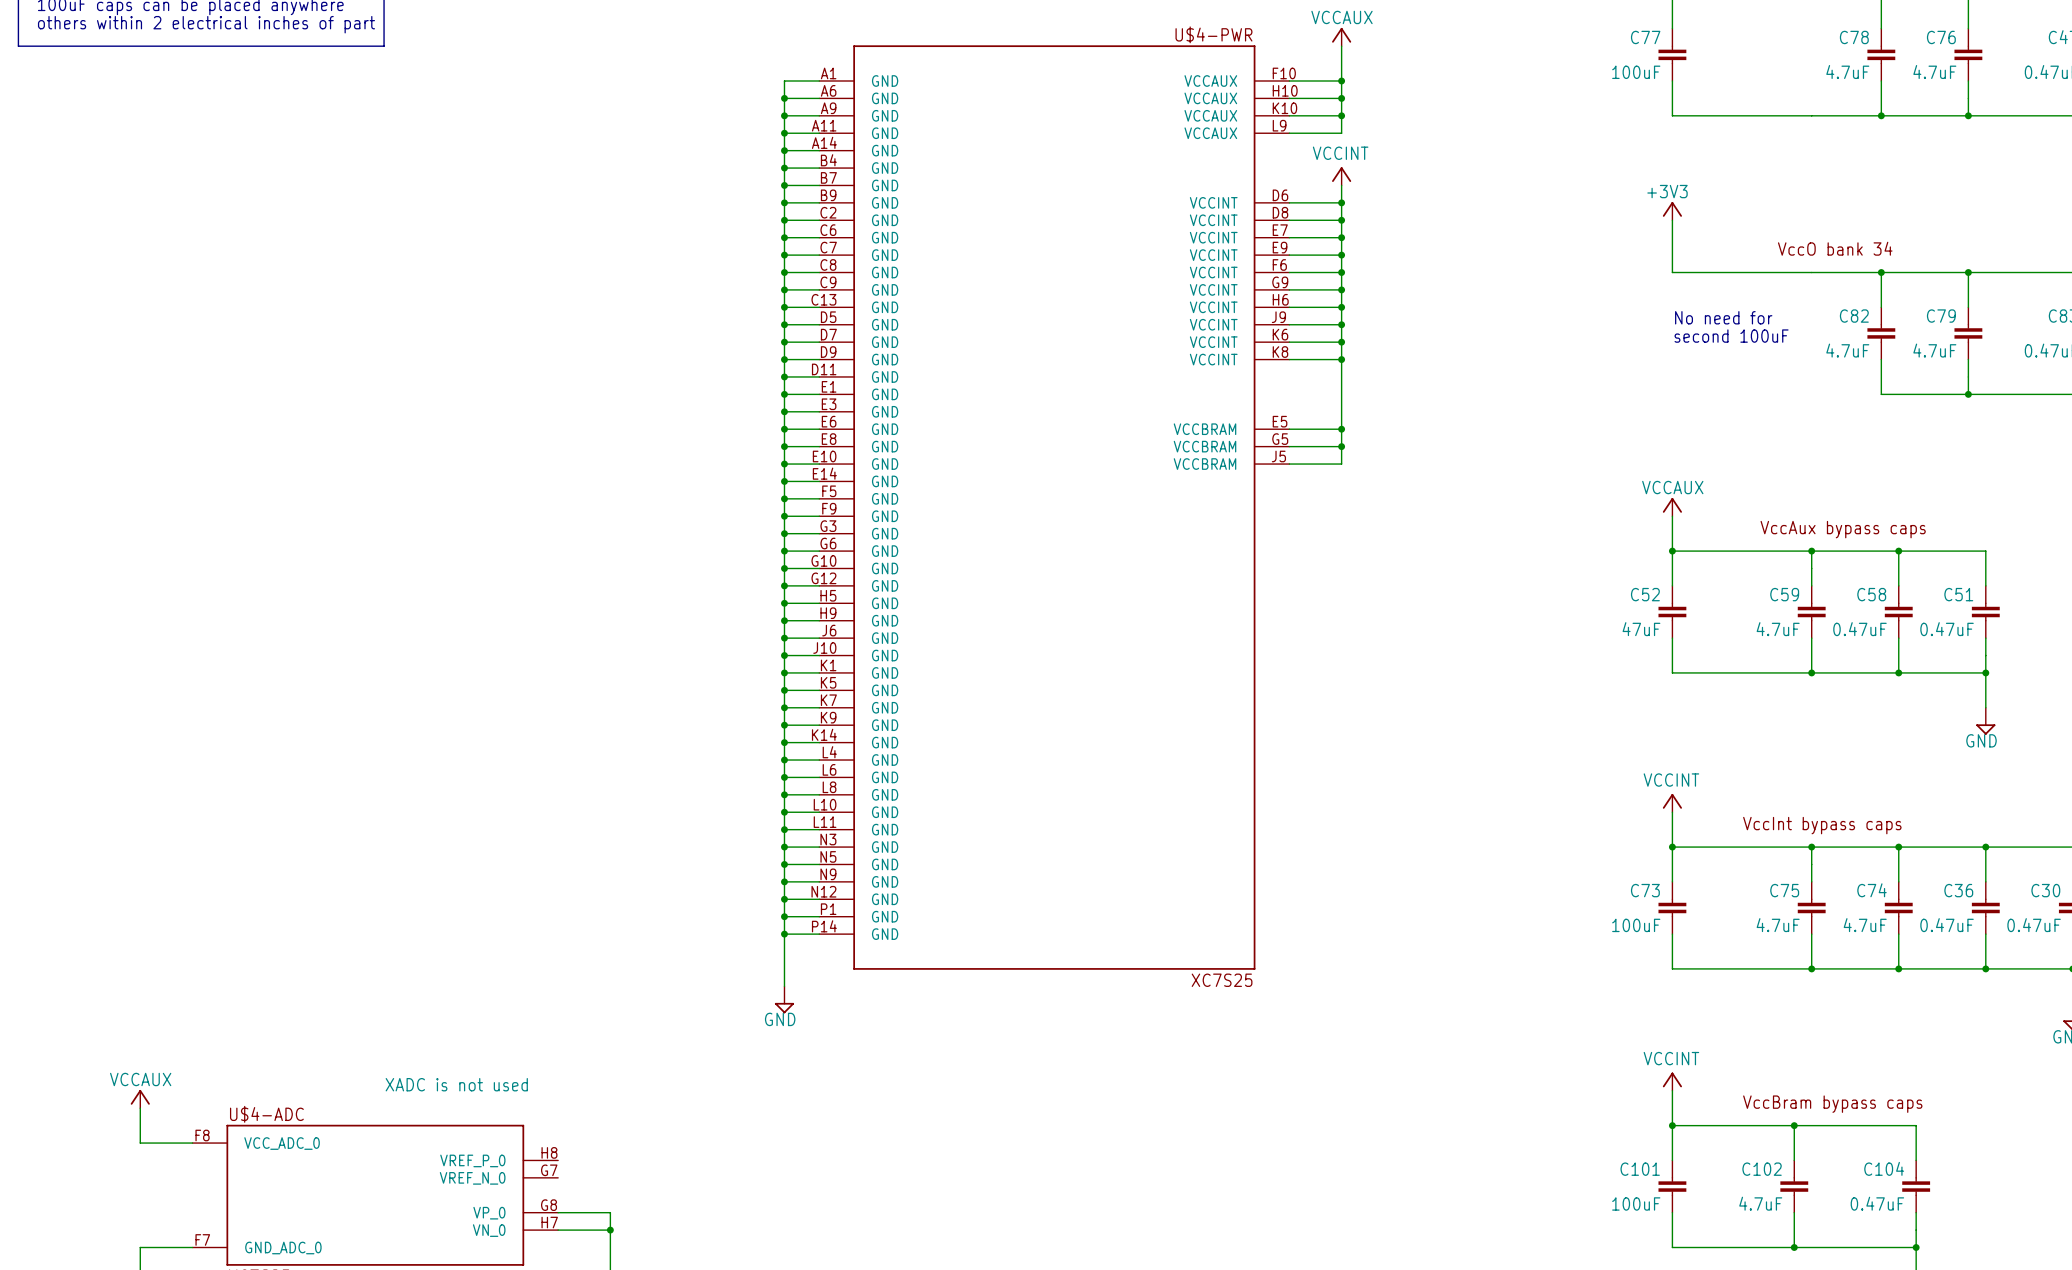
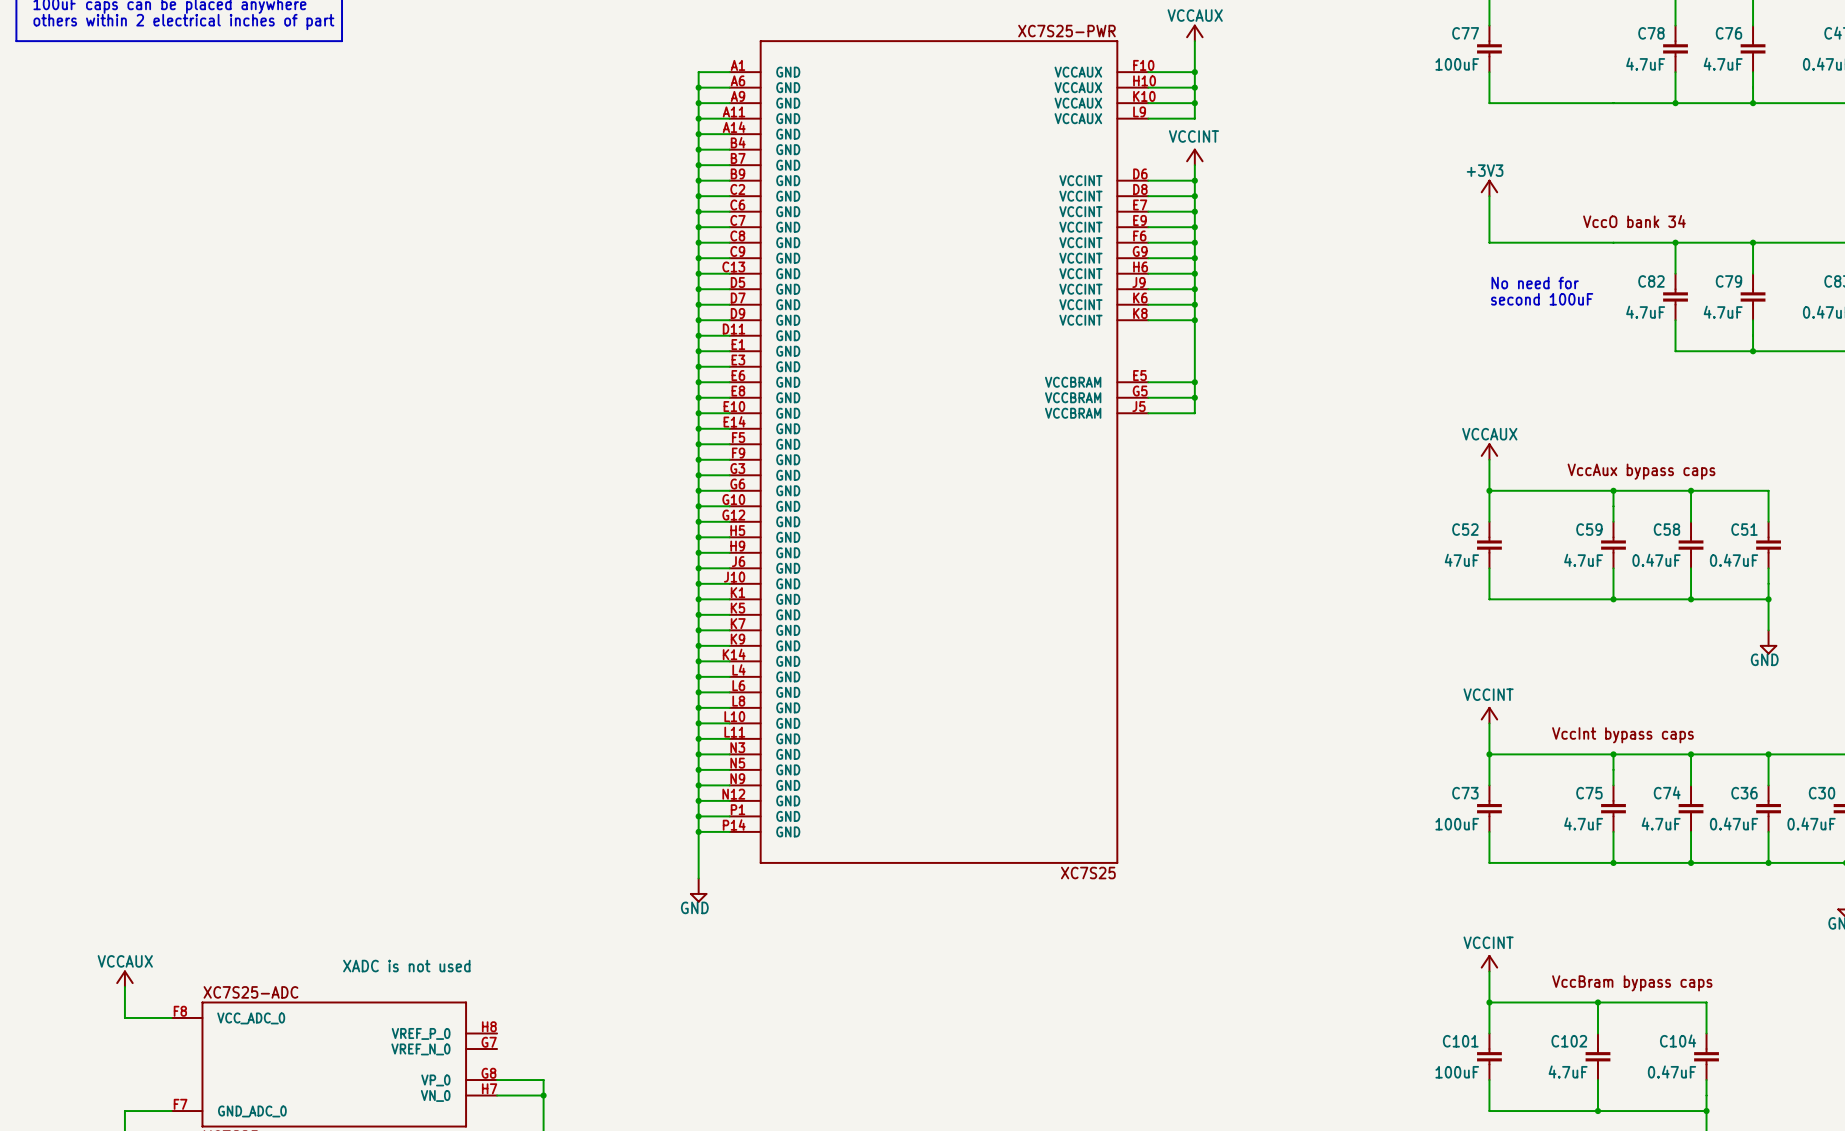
U$4-PWR name: U$4-PWR (1213, 34) -> XC7S25-PWR (1066, 31)
U$4-ADC name: U$4-ADC (266, 1114) -> XC7S25-ADC (250, 992)

